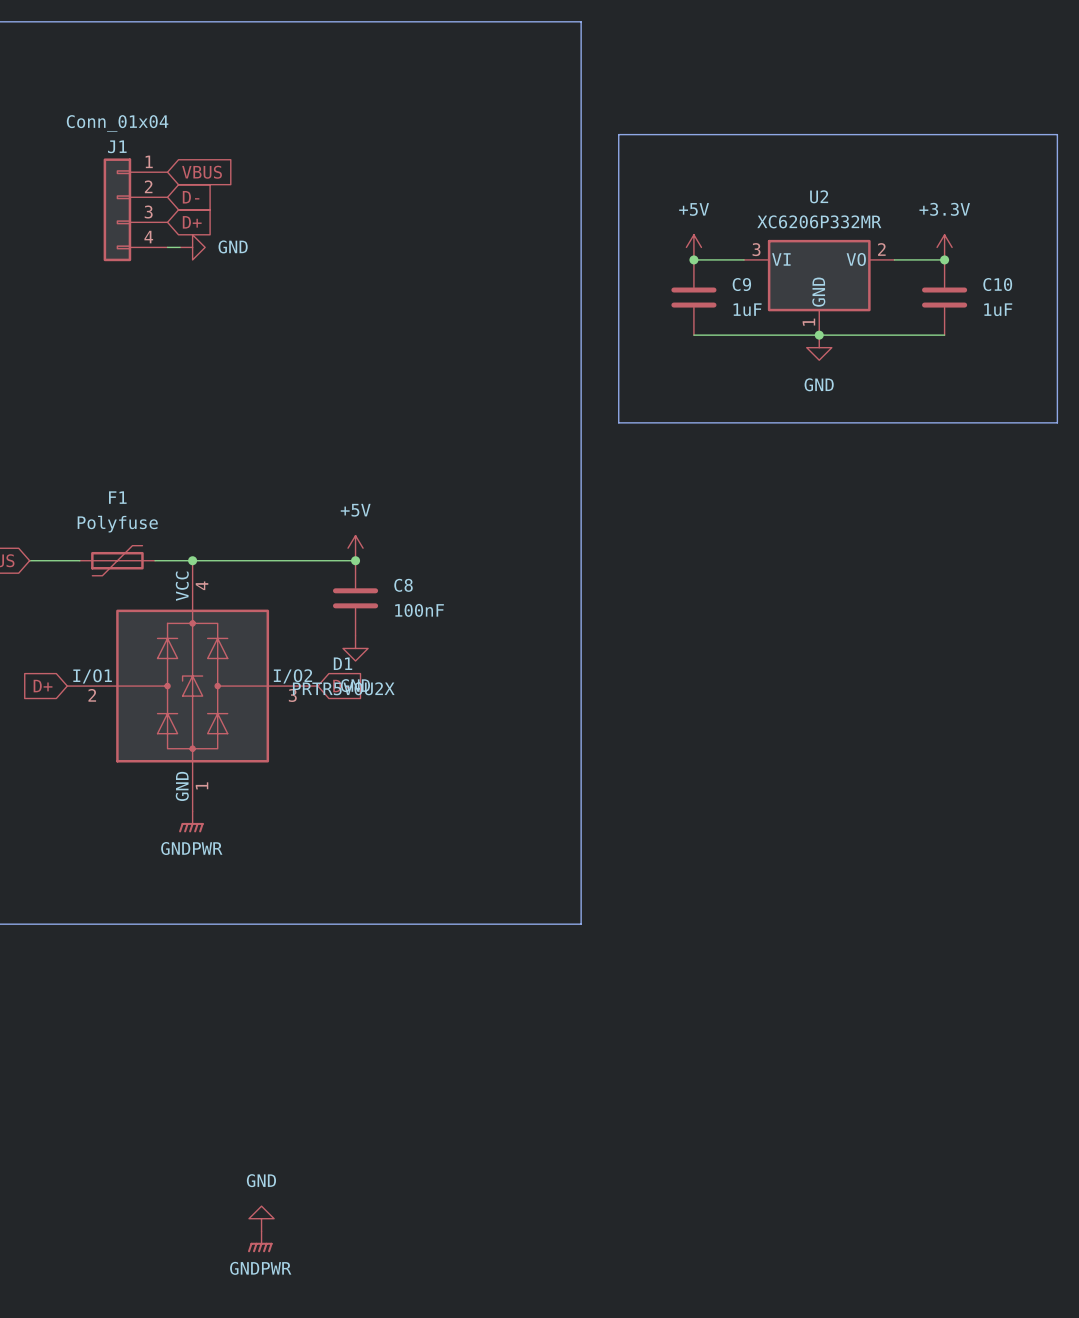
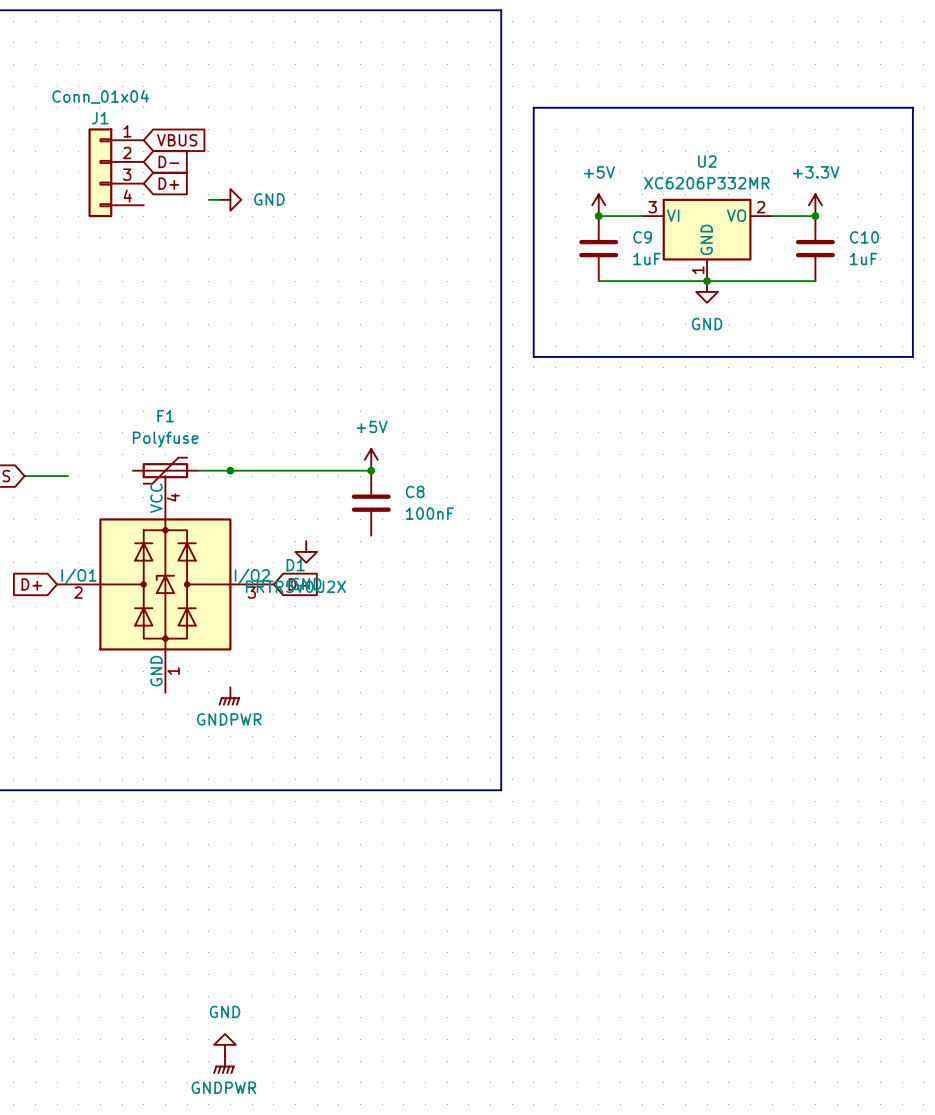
wire: (167, 247) (180, 247) -> (208, 199) (219, 199)
power symbol position: GND (192, 247) -> GND (230, 199)
power symbol position: +5V (355, 548) -> +5V (371, 459)
junction: none -> (230, 470)
junction: none -> (371, 470)
F1 position: (117, 560) -> (165, 470)
wire: (155, 560) (355, 560) -> (197, 470) (371, 470)
junction: (192, 560) -> none
junction: (355, 560) -> none
C8 position: (355, 598) -> (371, 503)
power symbol position: GNDPWR (191, 821) -> GNDPWR (229, 696)

